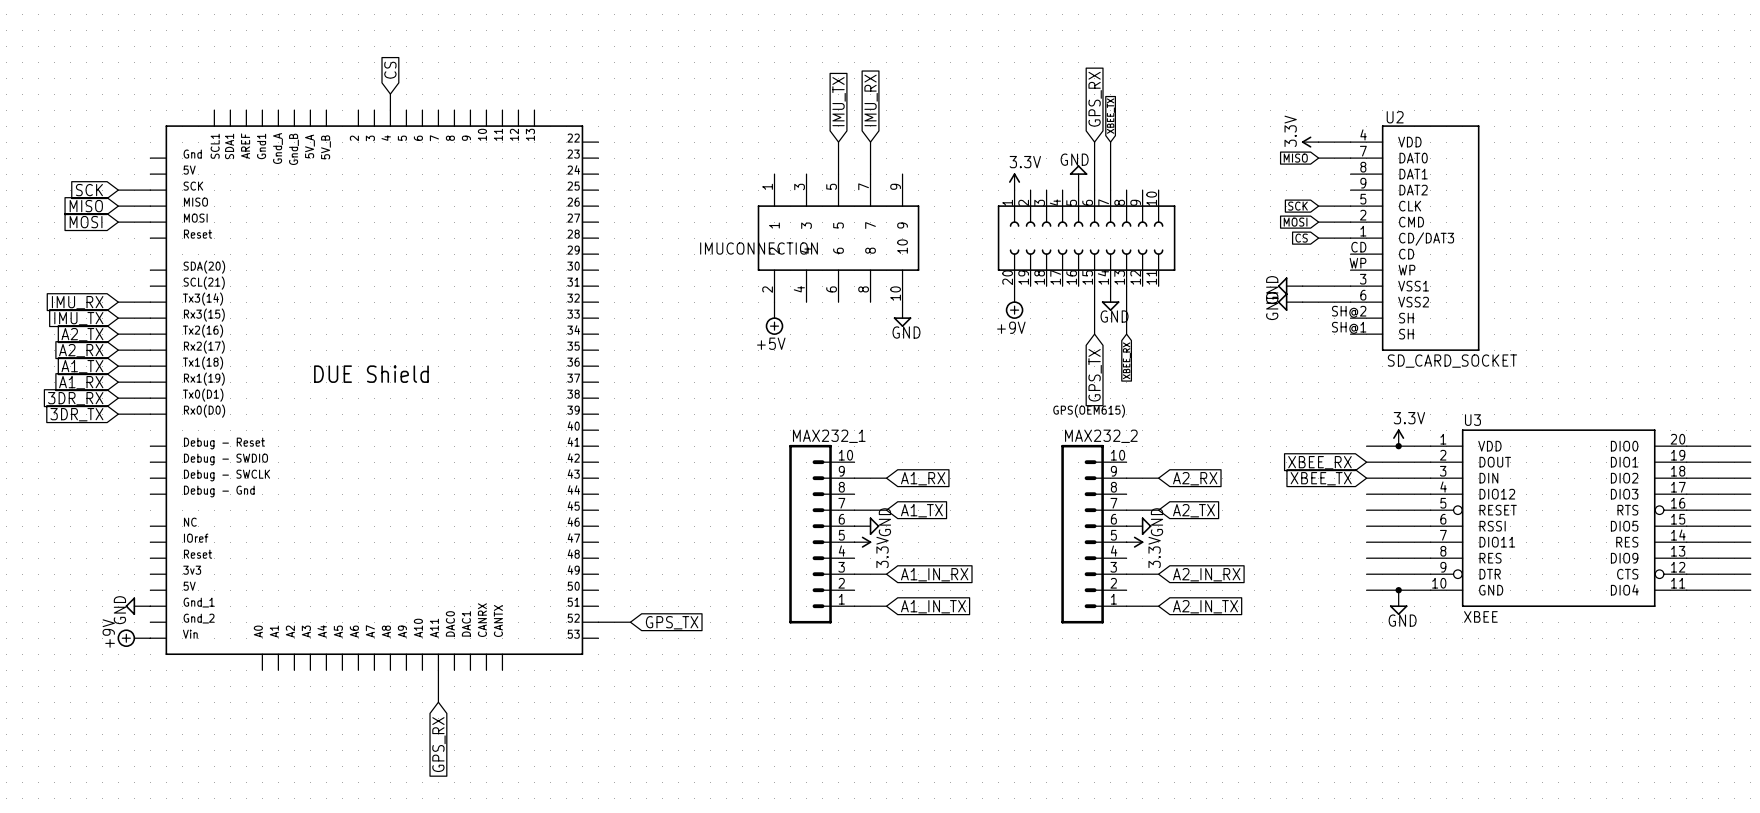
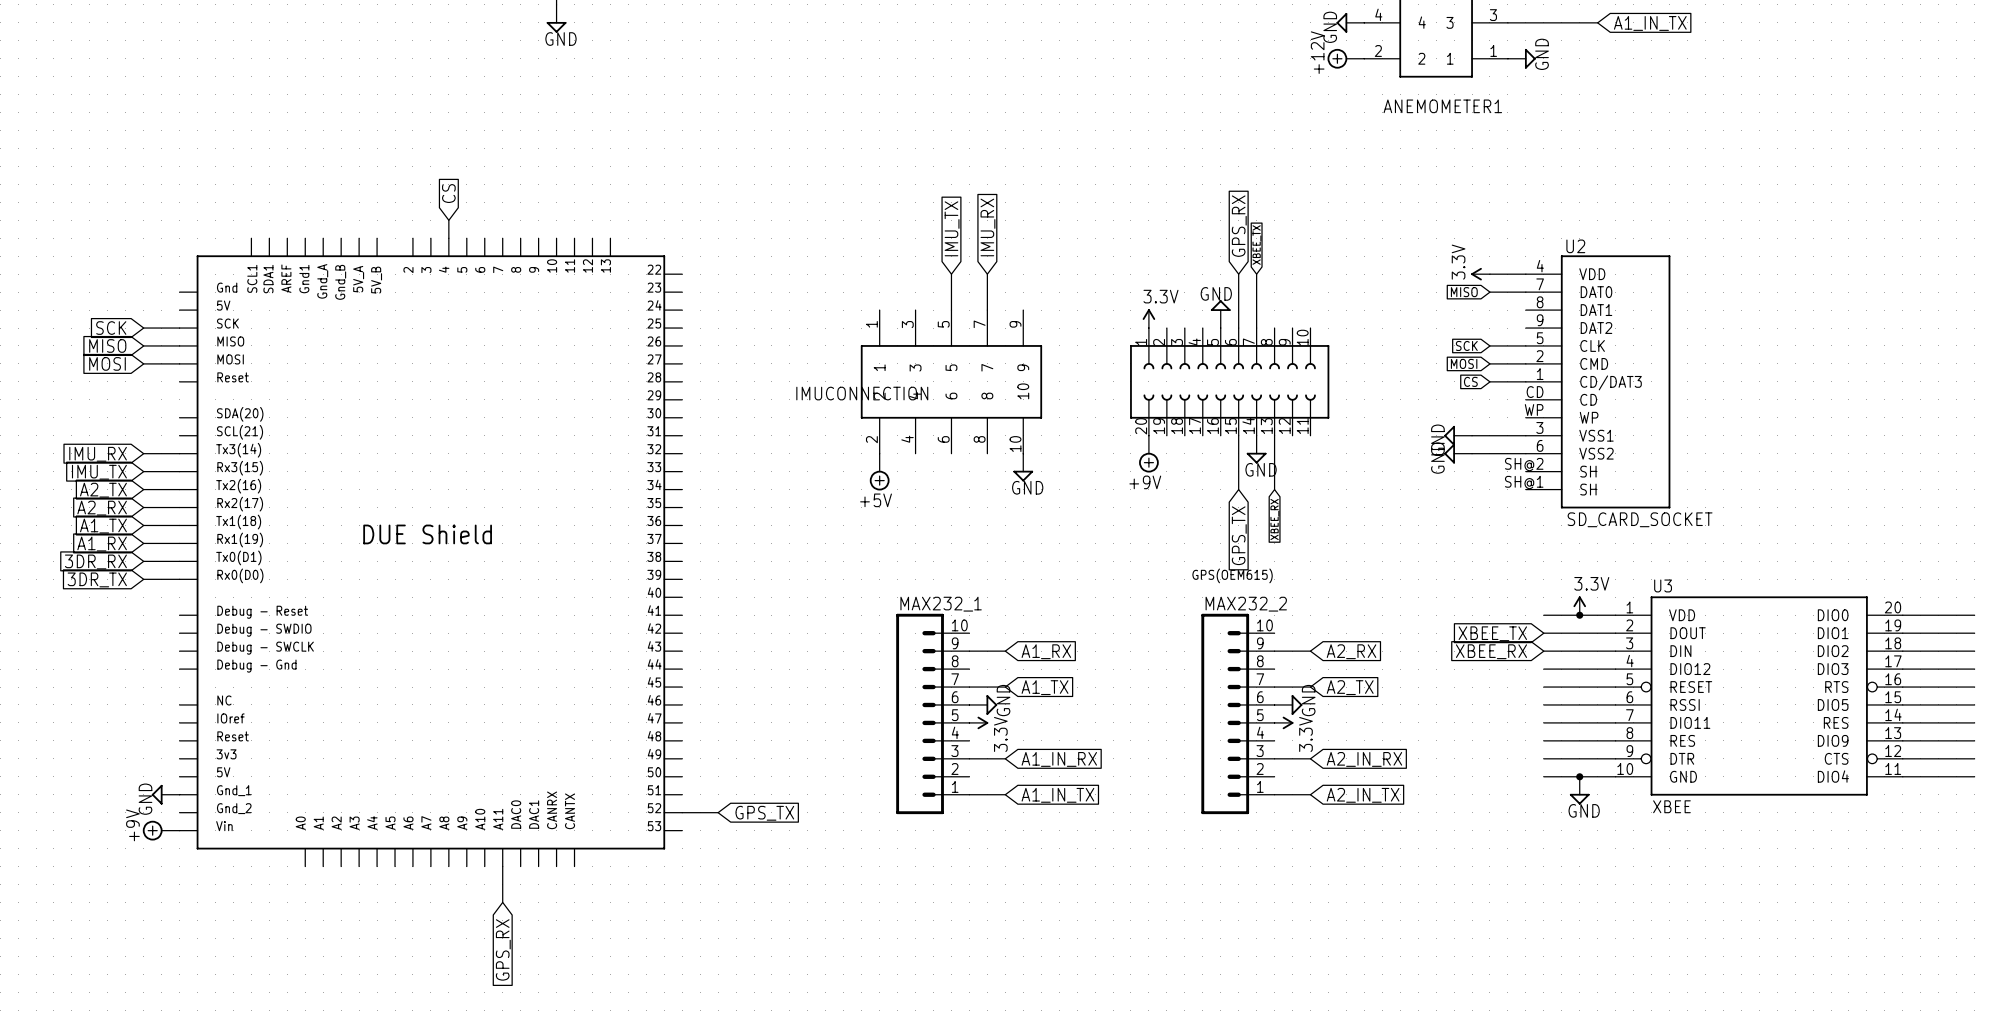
global label: XBEE_RX (1319, 462) -> XBEE_TX (1492, 633)
global label: XBEE_TX (1321, 478) -> XBEE_RX (1491, 651)

